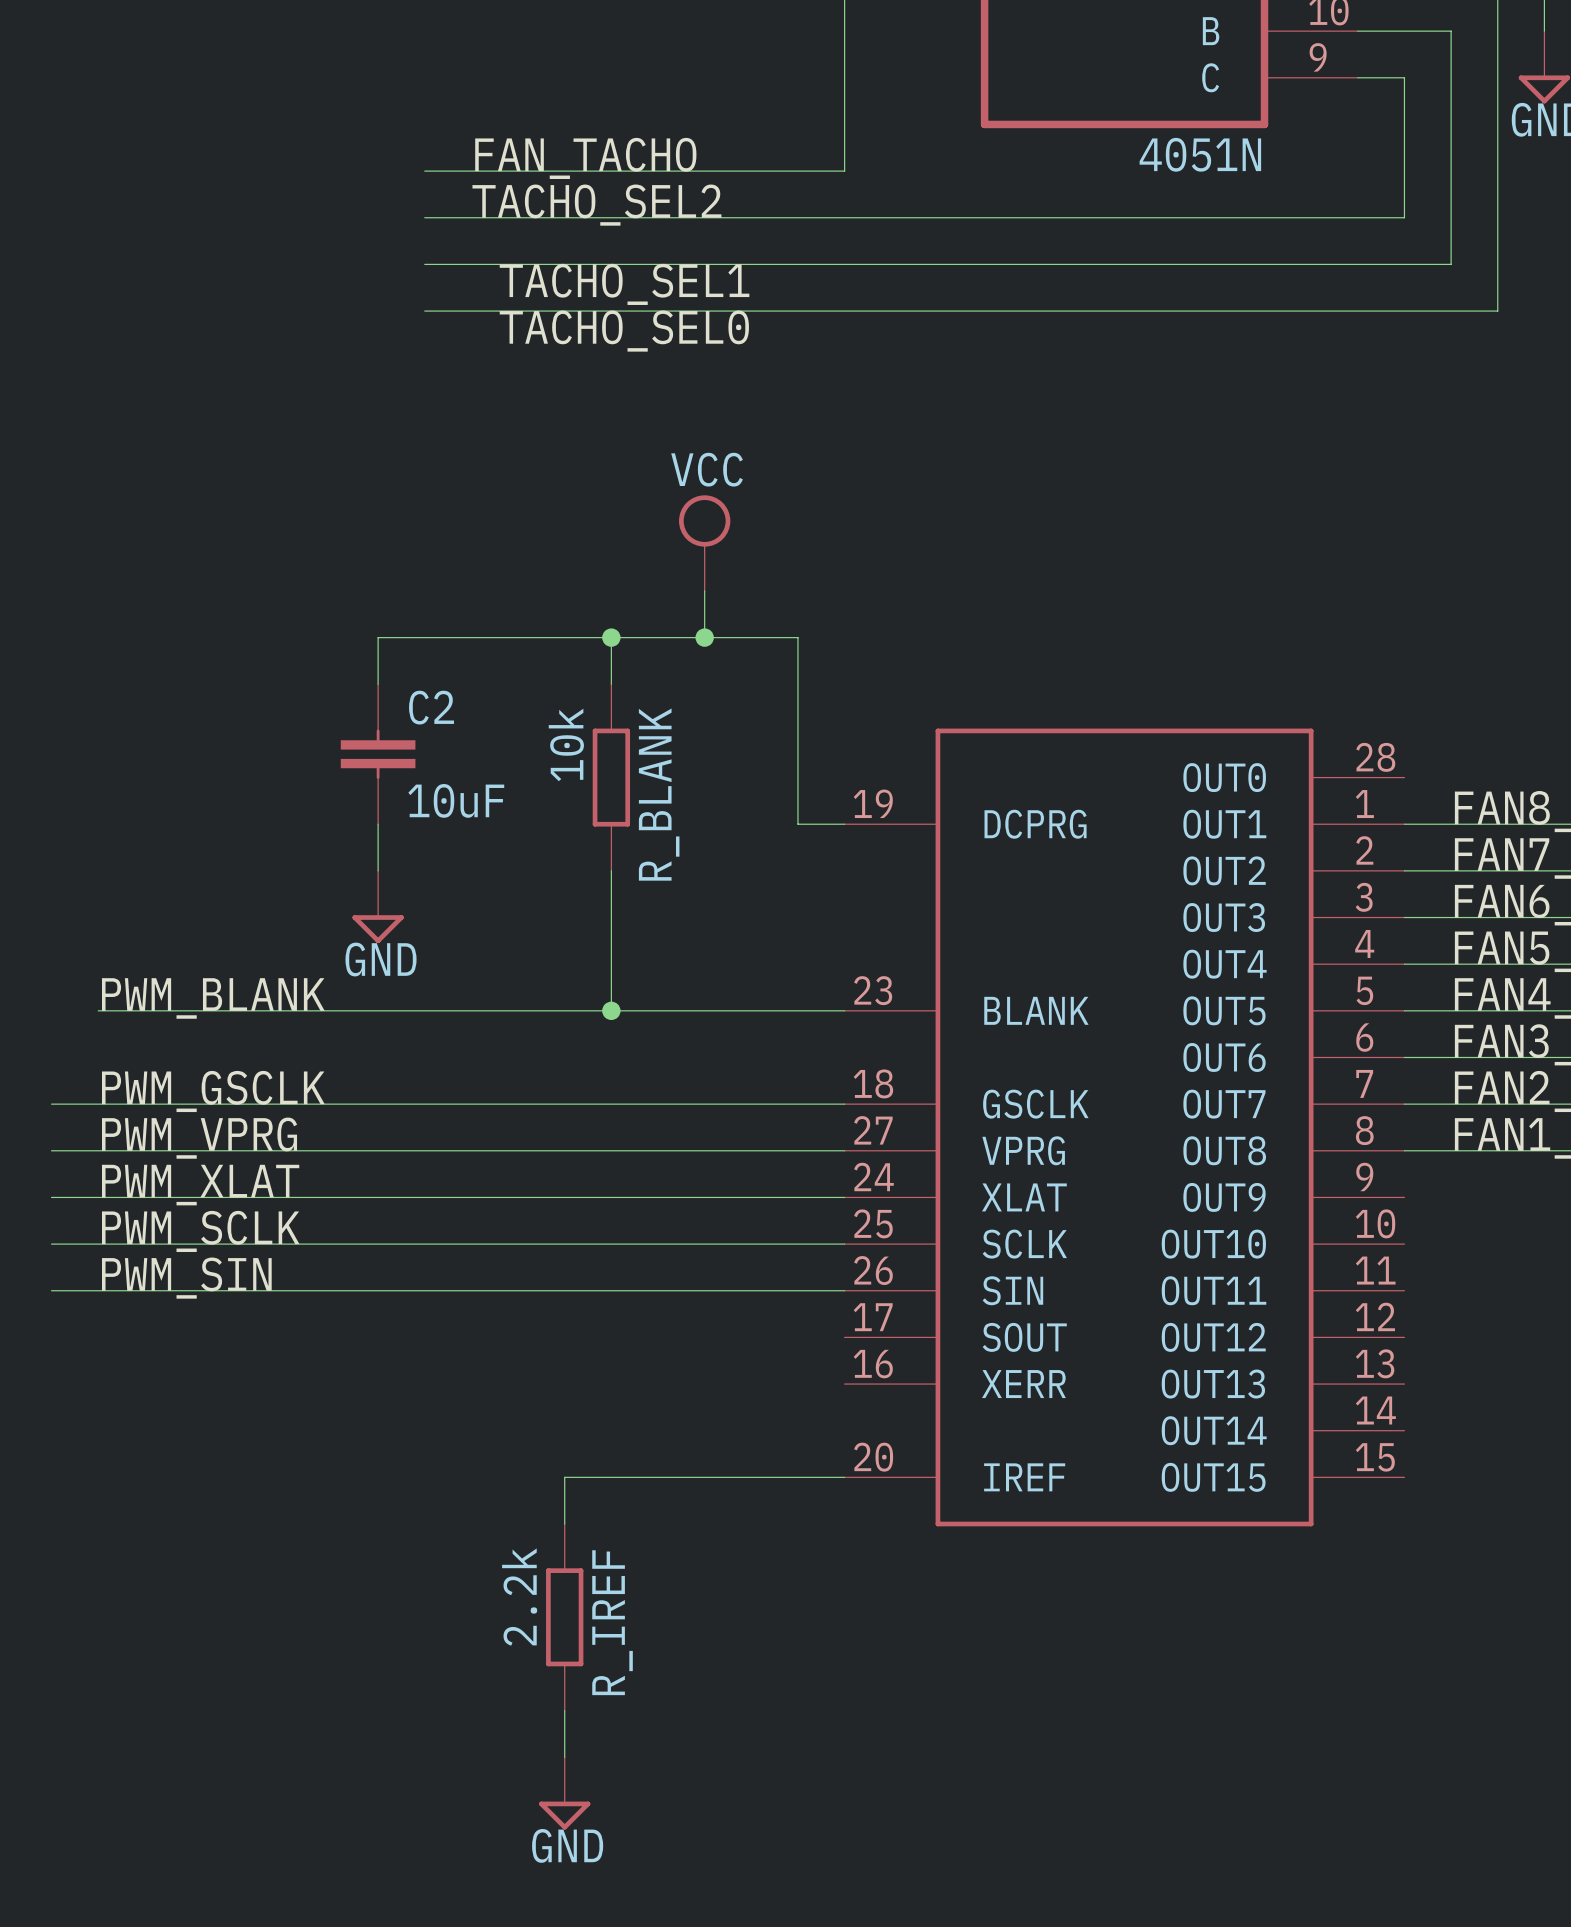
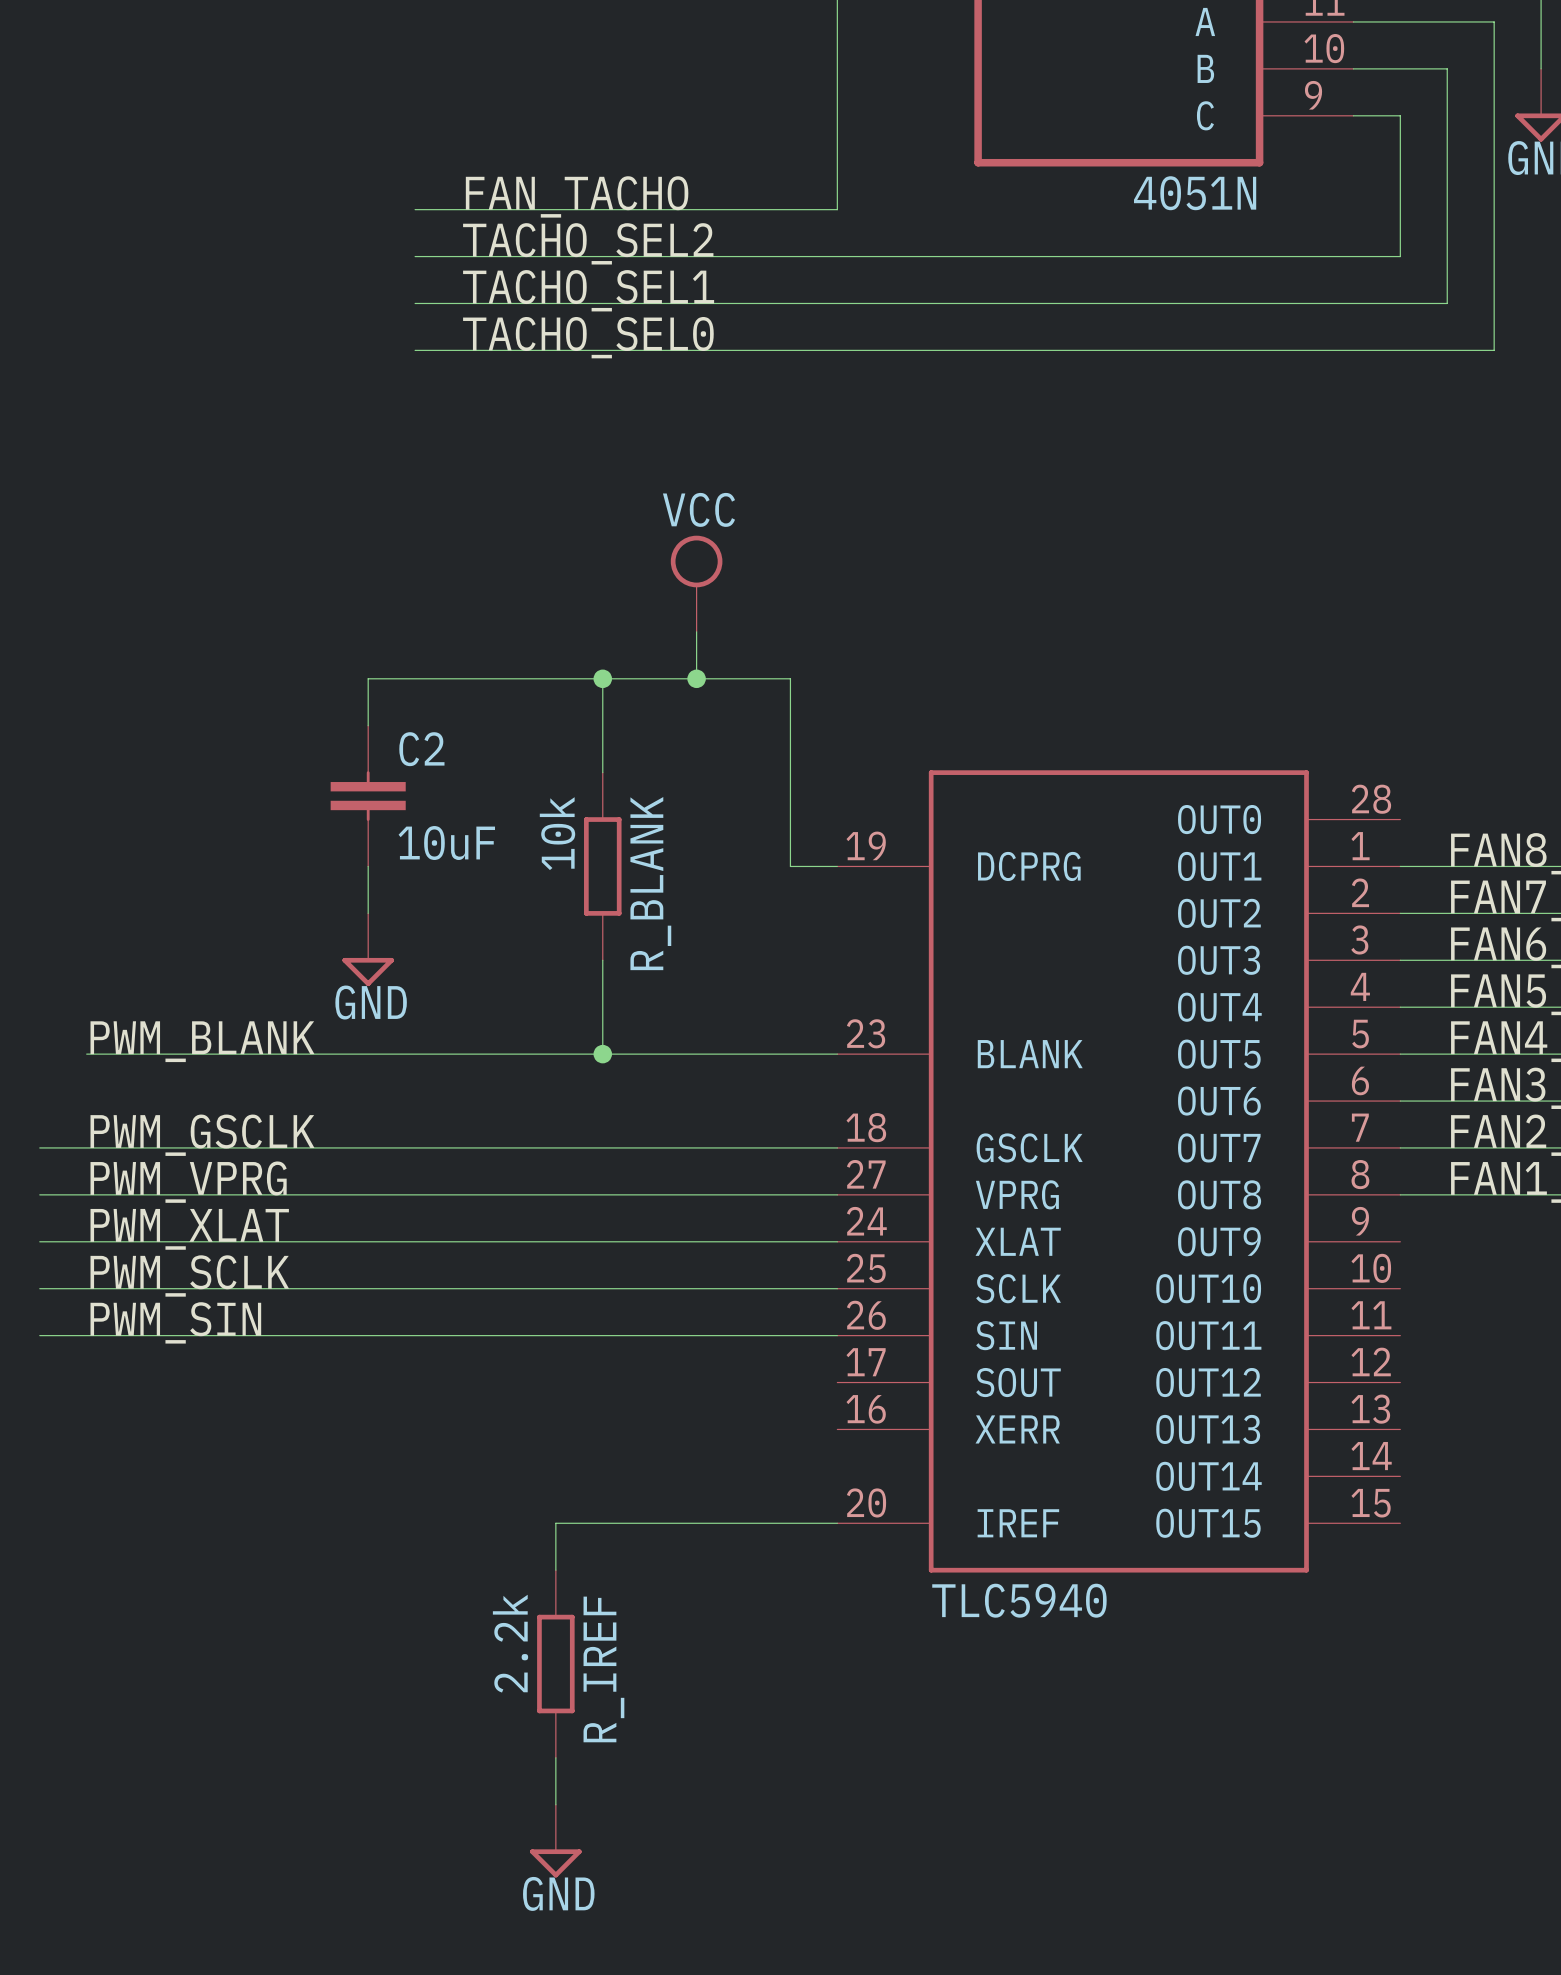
label position: TACHO_SEL1 (624, 284) -> TACHO_SEL1 (588, 290)
label position: TACHO_SEL0 (624, 331) -> TACHO_SEL0 (588, 337)
R_BLANK position: (611, 777) -> (602, 866)
part value: none -> TLC5940 (1019, 1600)

